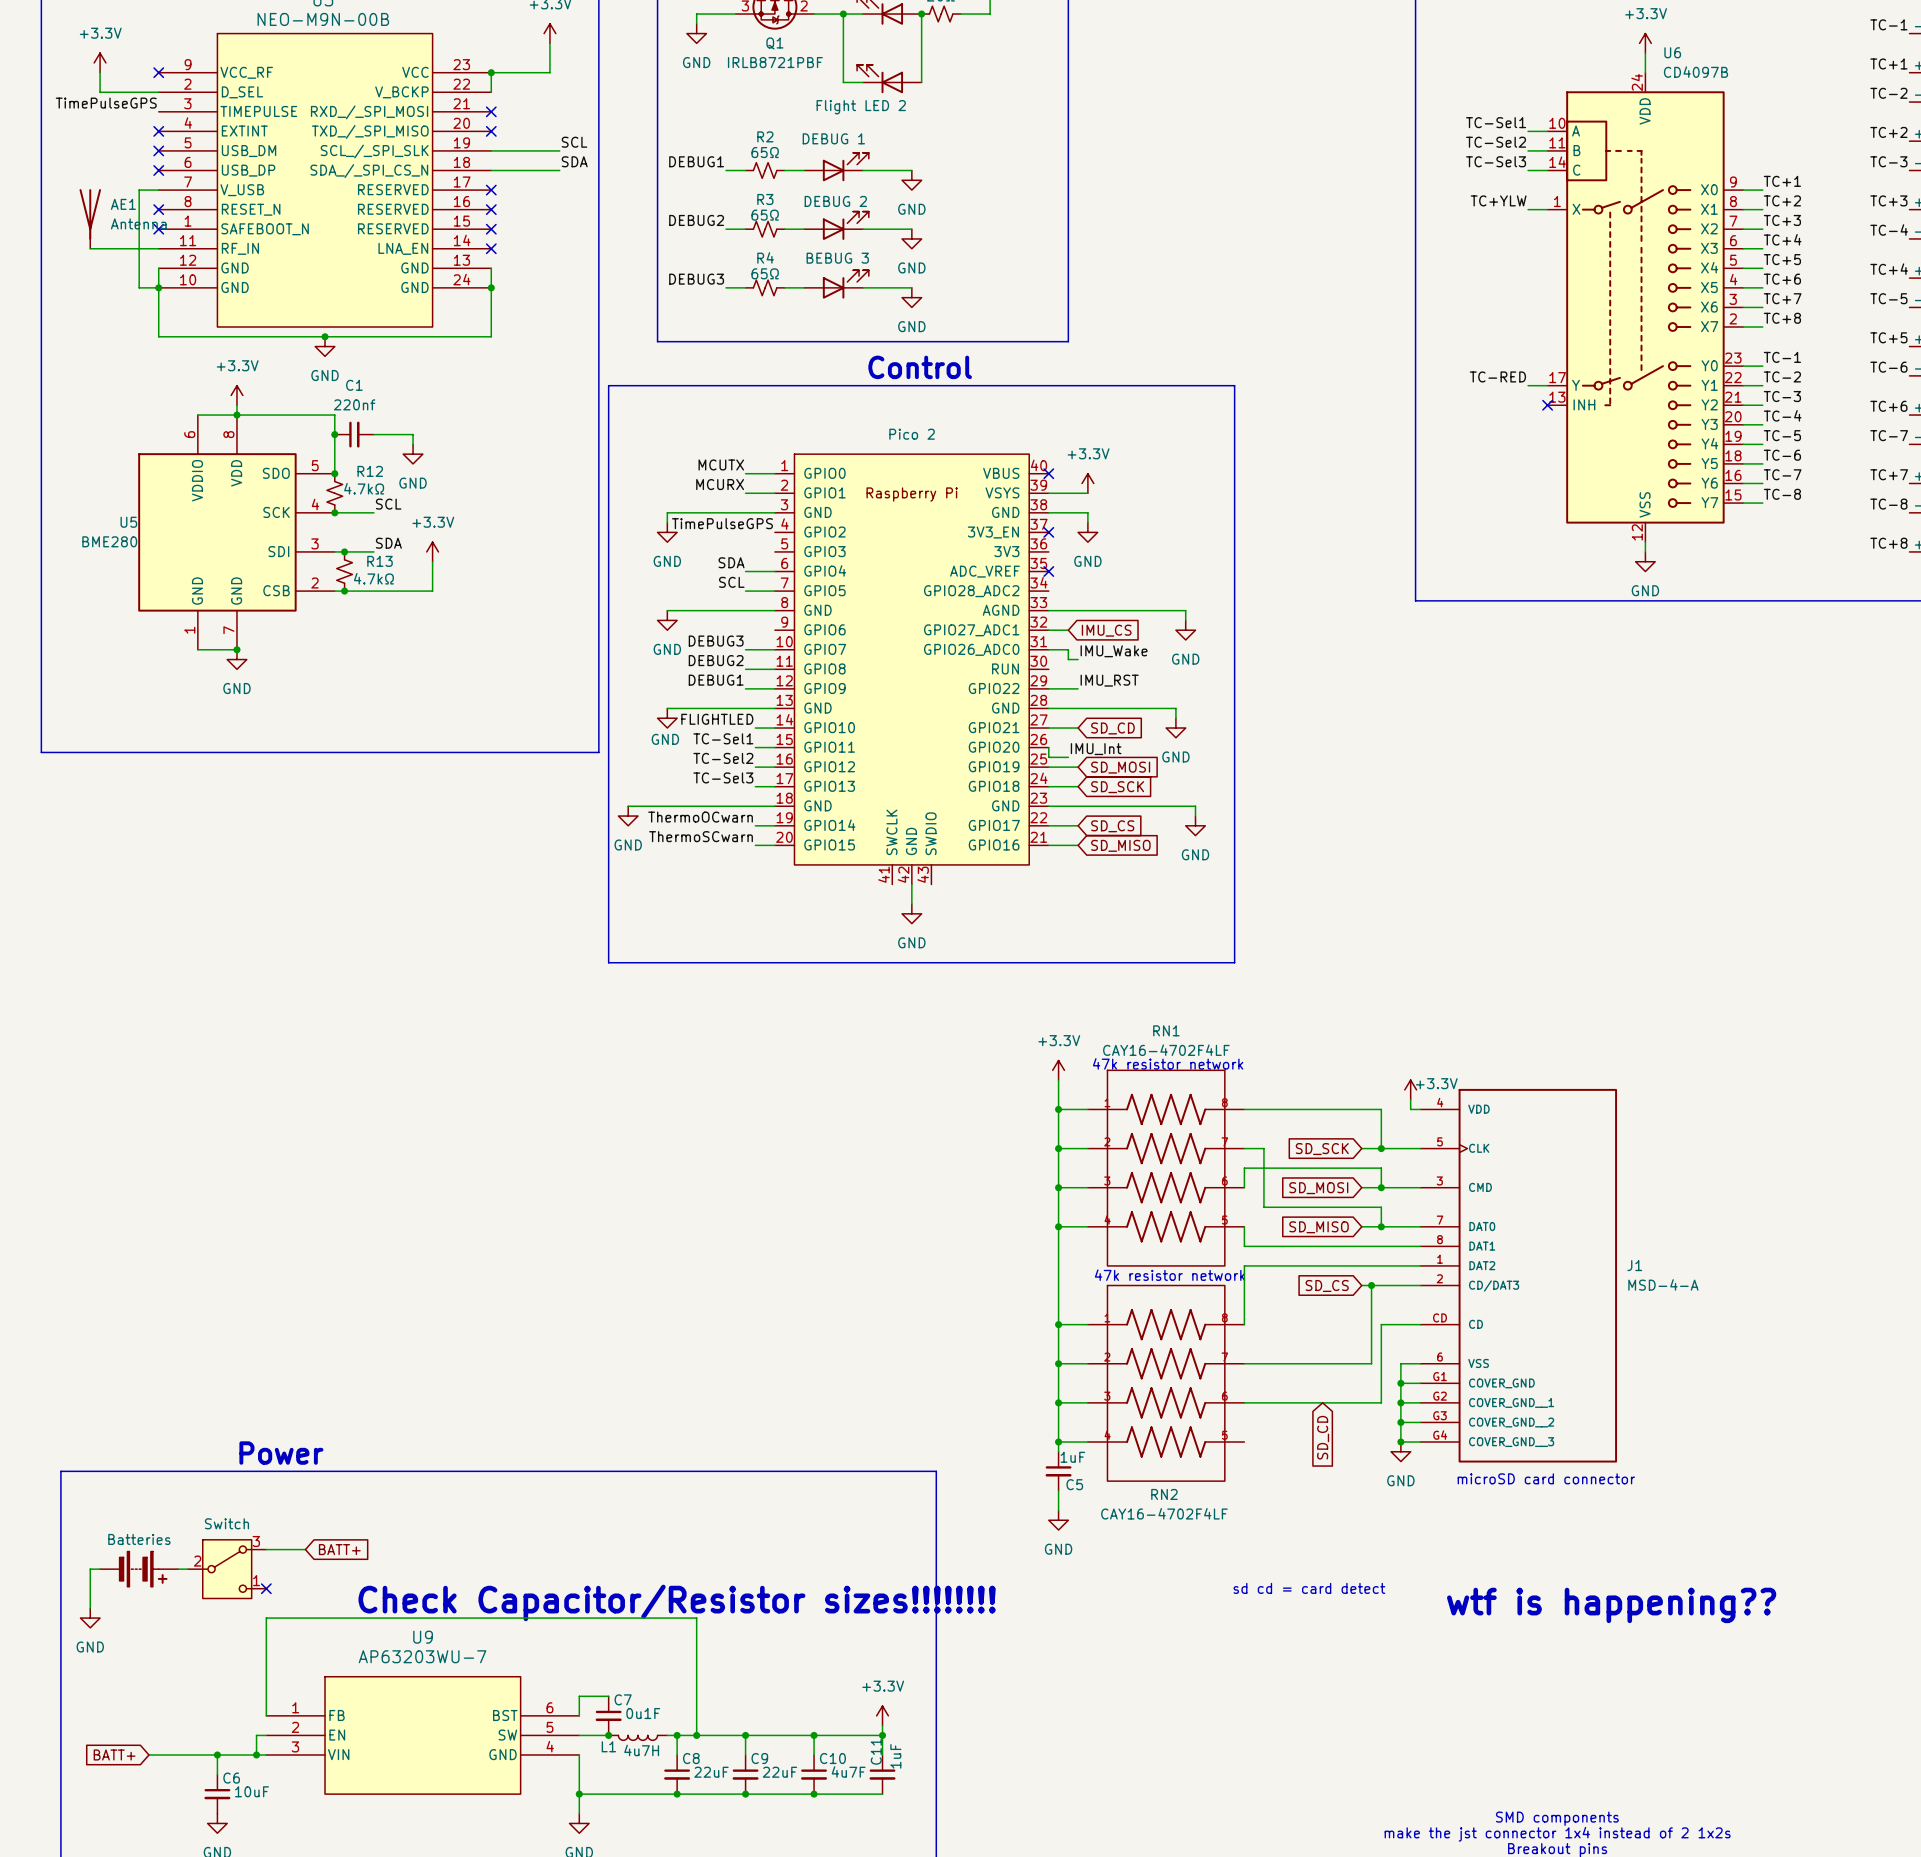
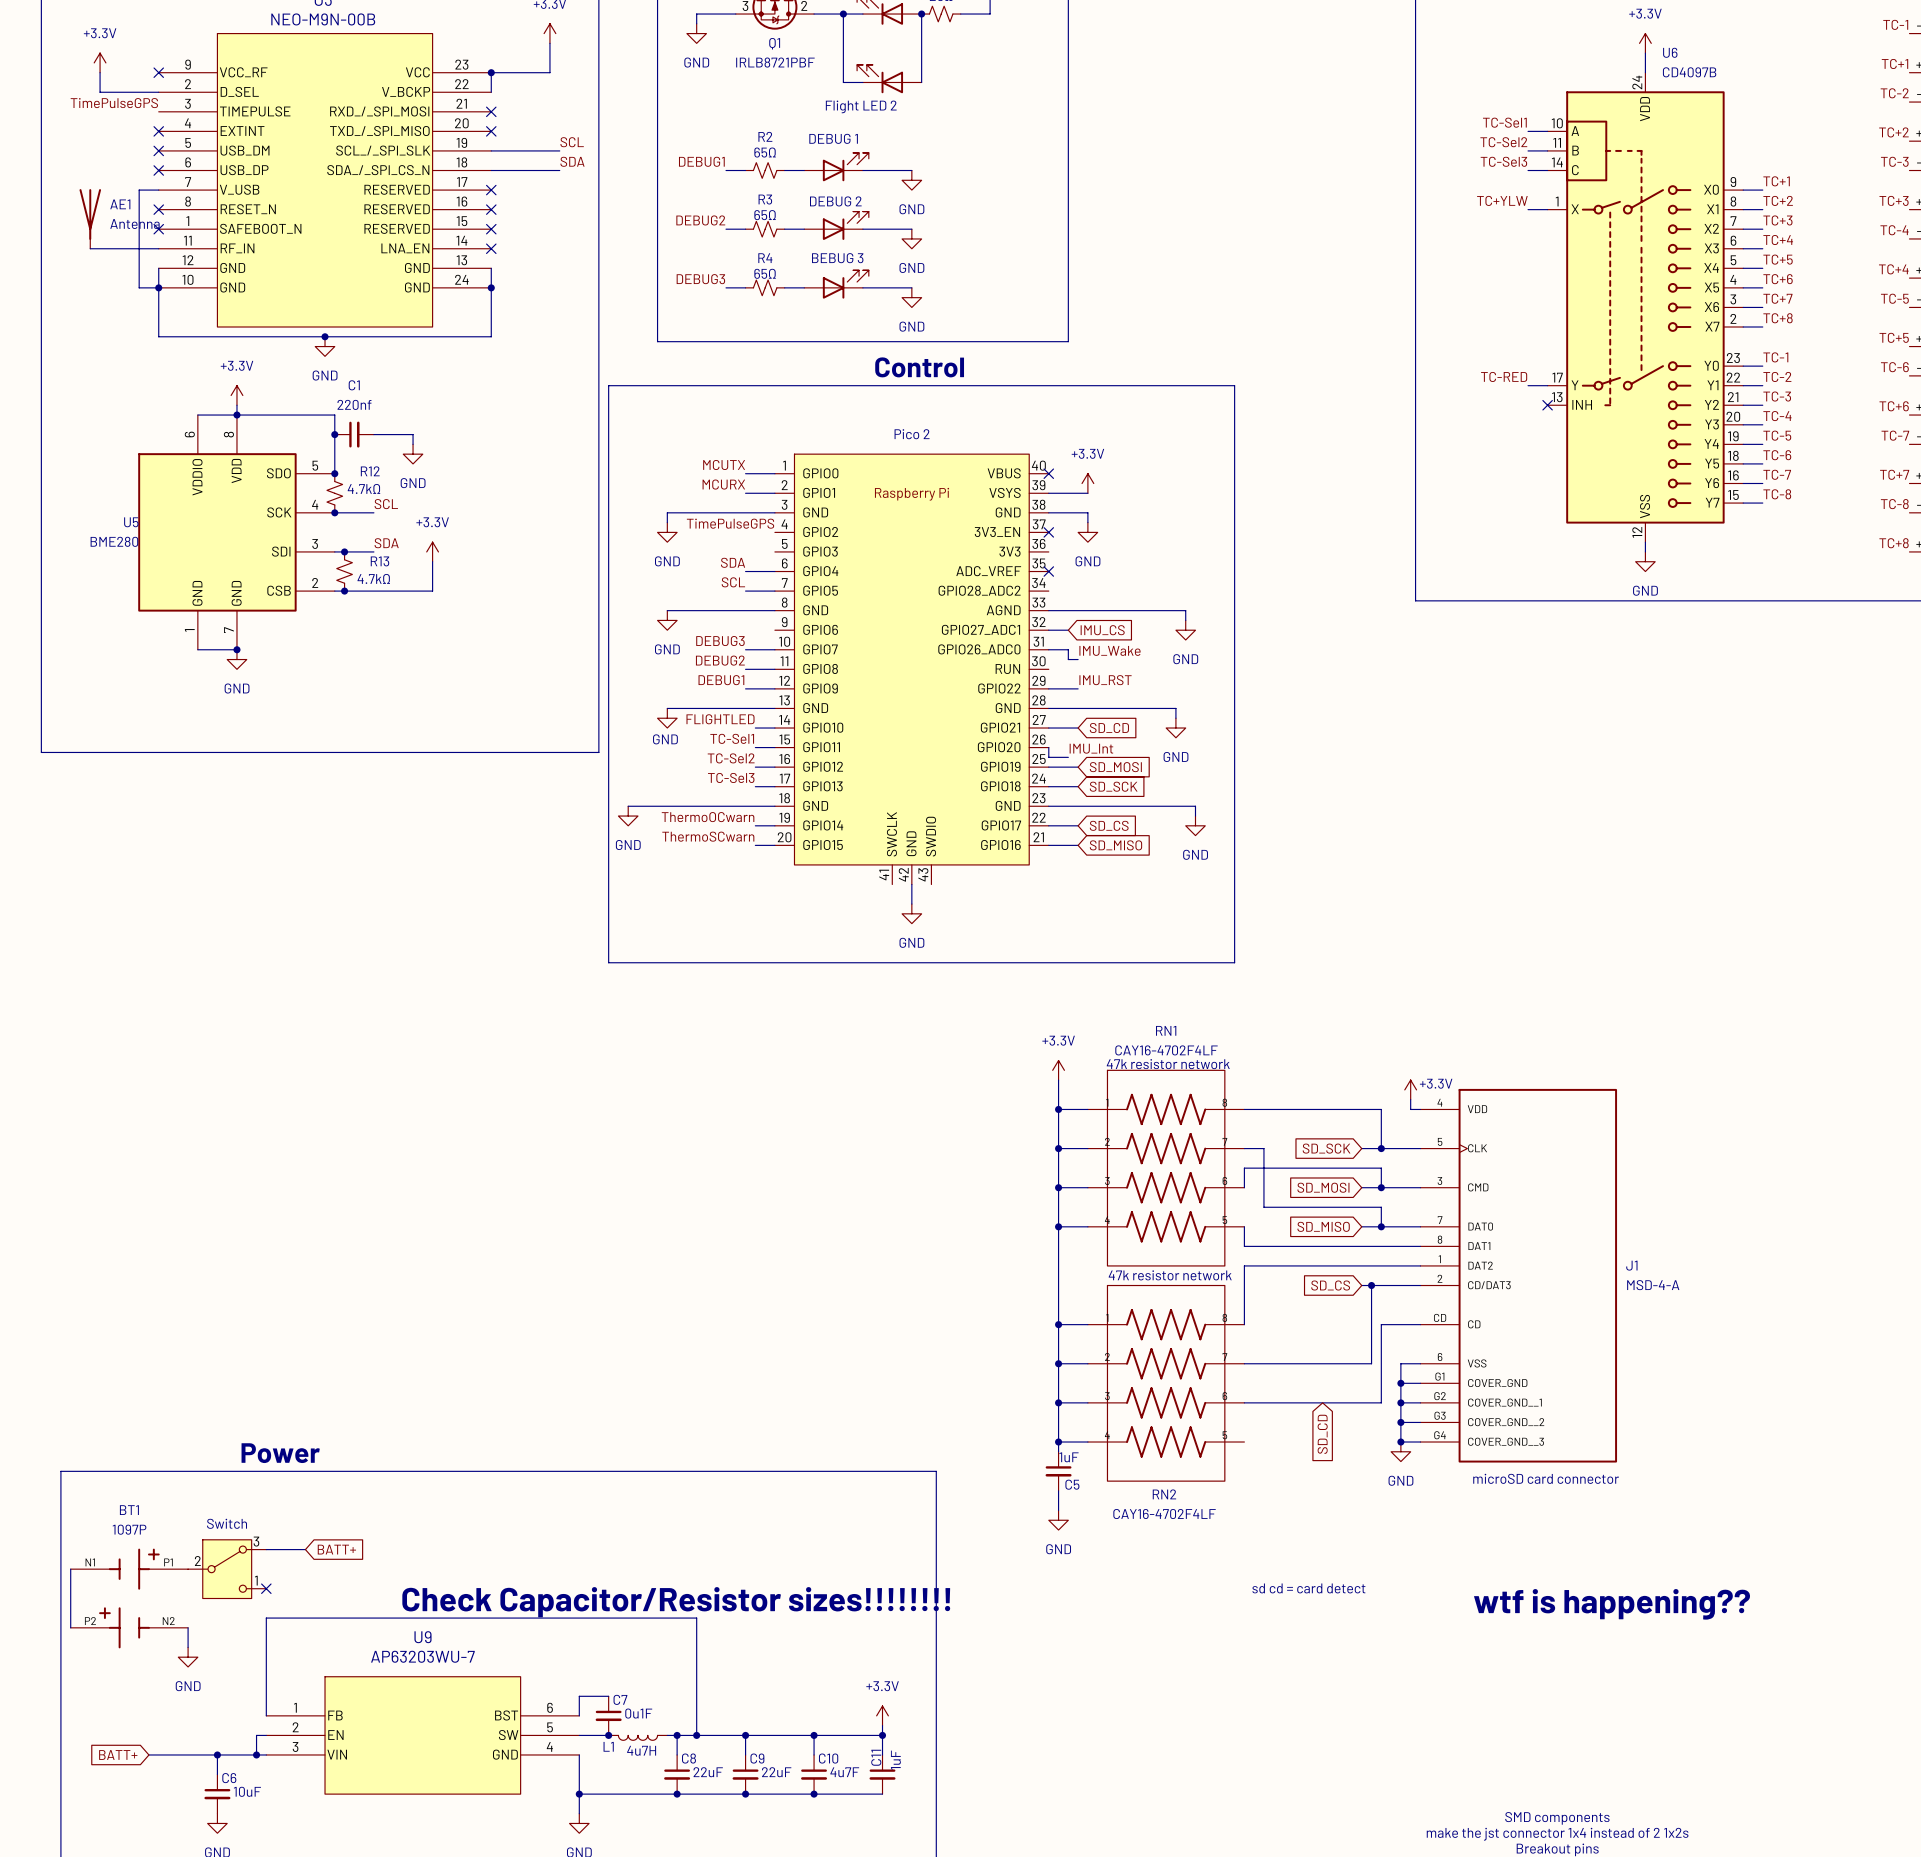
wire: none -> (70, 1569) (70, 1627)
wire: (100, 1569) (90, 1569) (90, 1608) -> none
part: Batteries (139, 1569) -> none
BT1: none -> 1097P (129, 1598)
power symbol position: GND (90, 1618) -> GND (188, 1657)
wire: none -> (188, 1627) (188, 1647)

